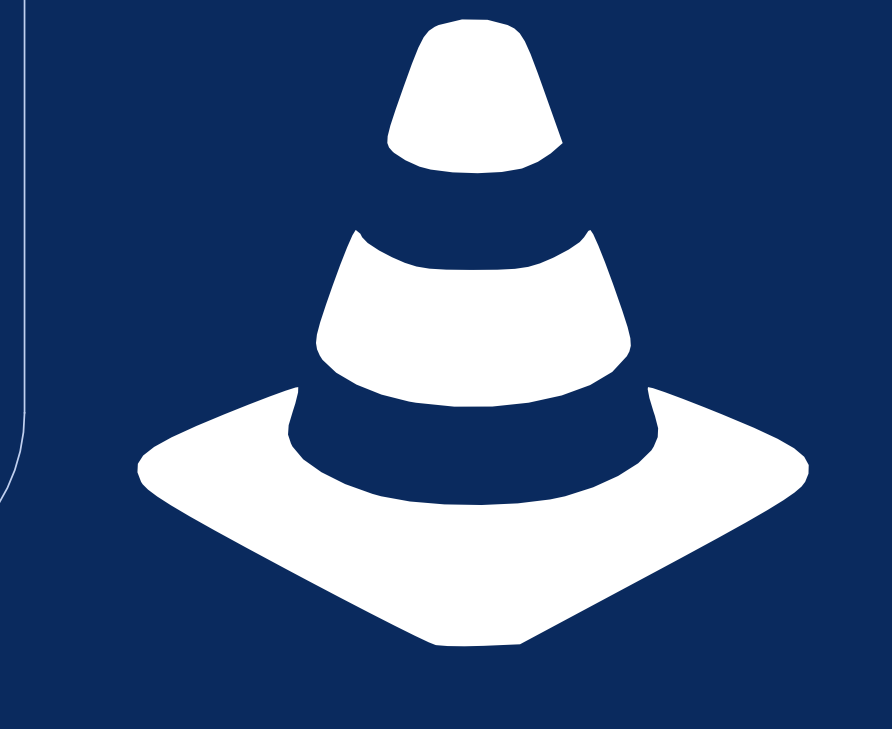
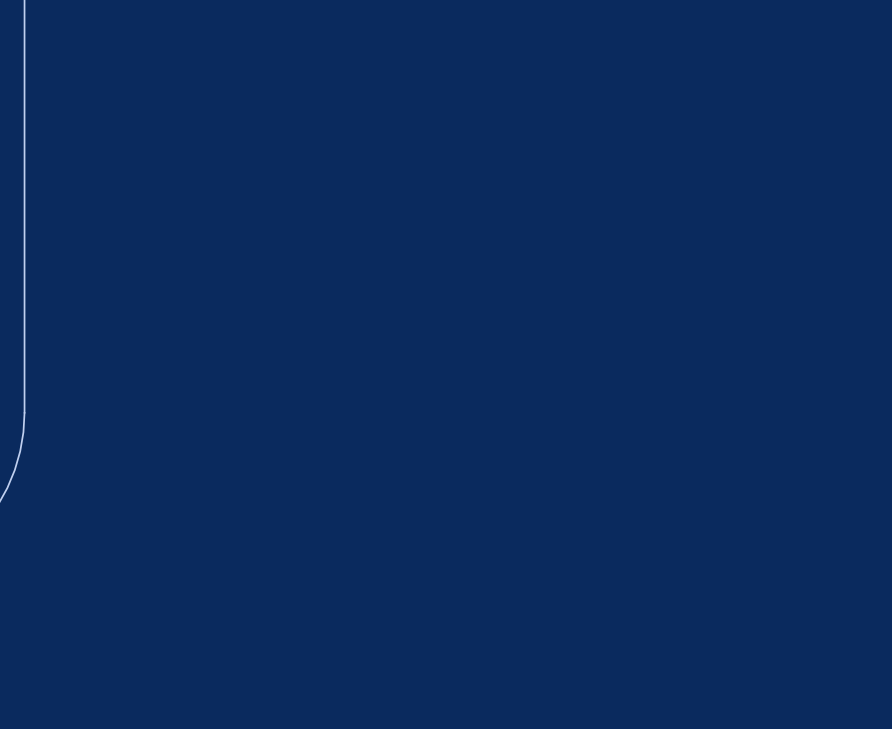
drawing: [137, 19, 809, 647] -> none

